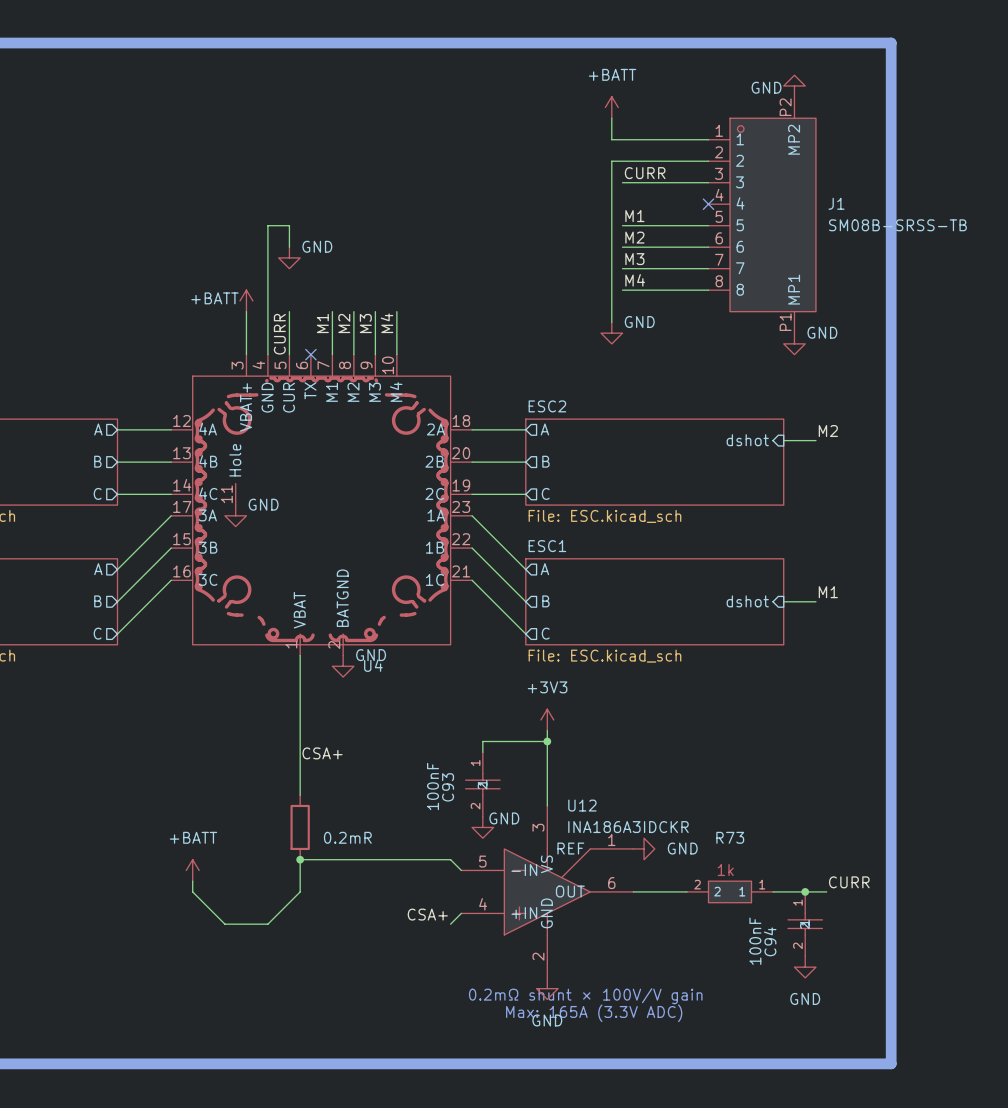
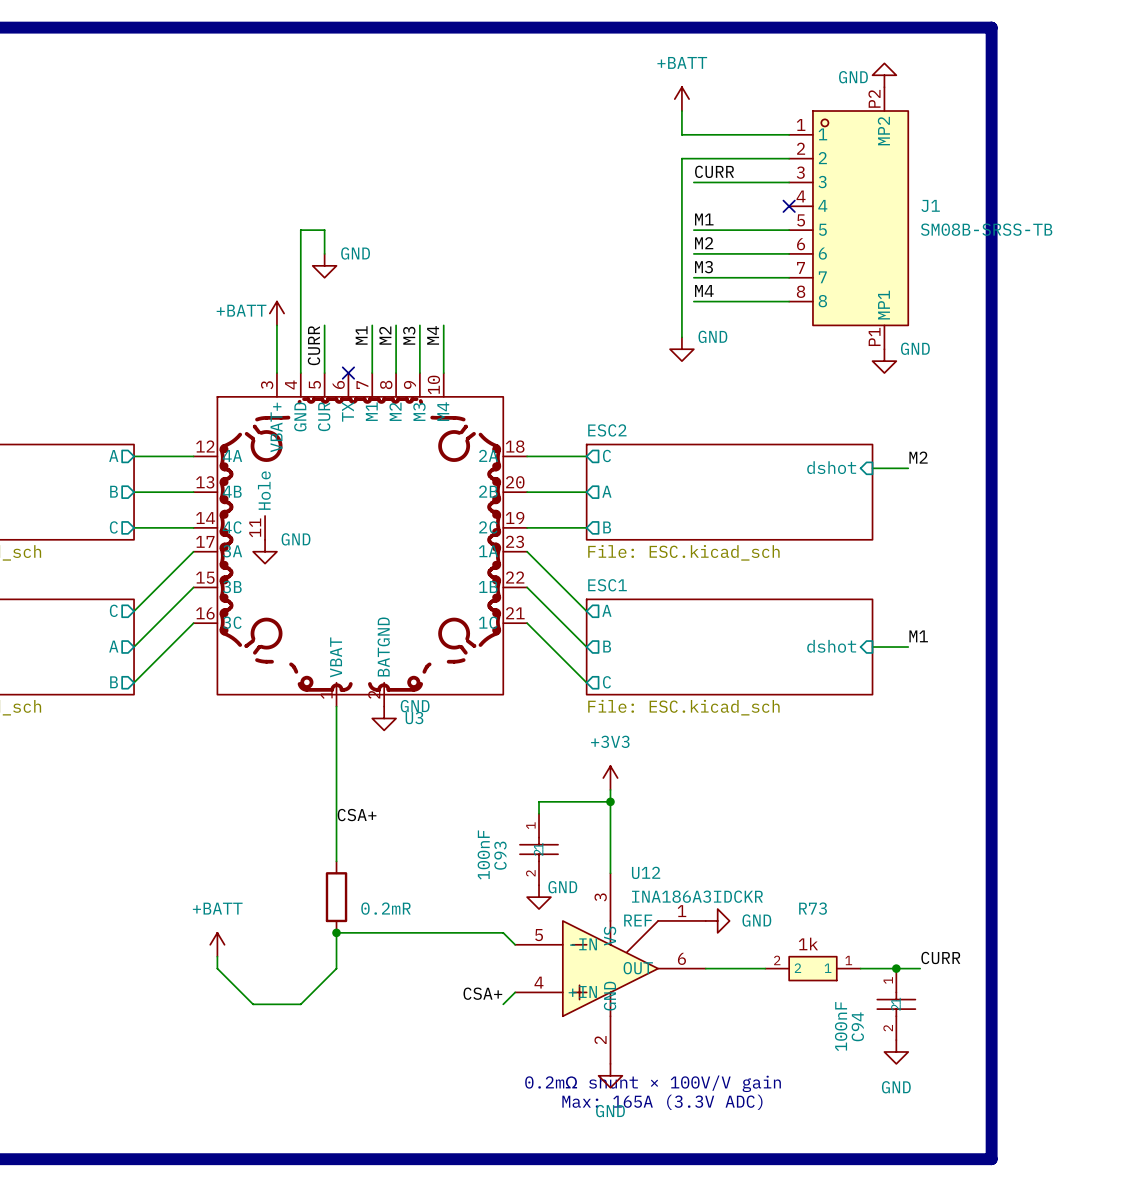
sheet pin: A (544, 429) -> C (606, 455)
sheet pin: B (545, 461) -> A (606, 491)
sheet pin: C (545, 493) -> B (607, 527)
sheet pin: A (98, 569) -> C (113, 610)
sheet pin: B (97, 601) -> A (113, 646)
sheet pin: C (97, 633) -> B (114, 682)
U4 name: U4 (373, 665) -> U3 (414, 718)

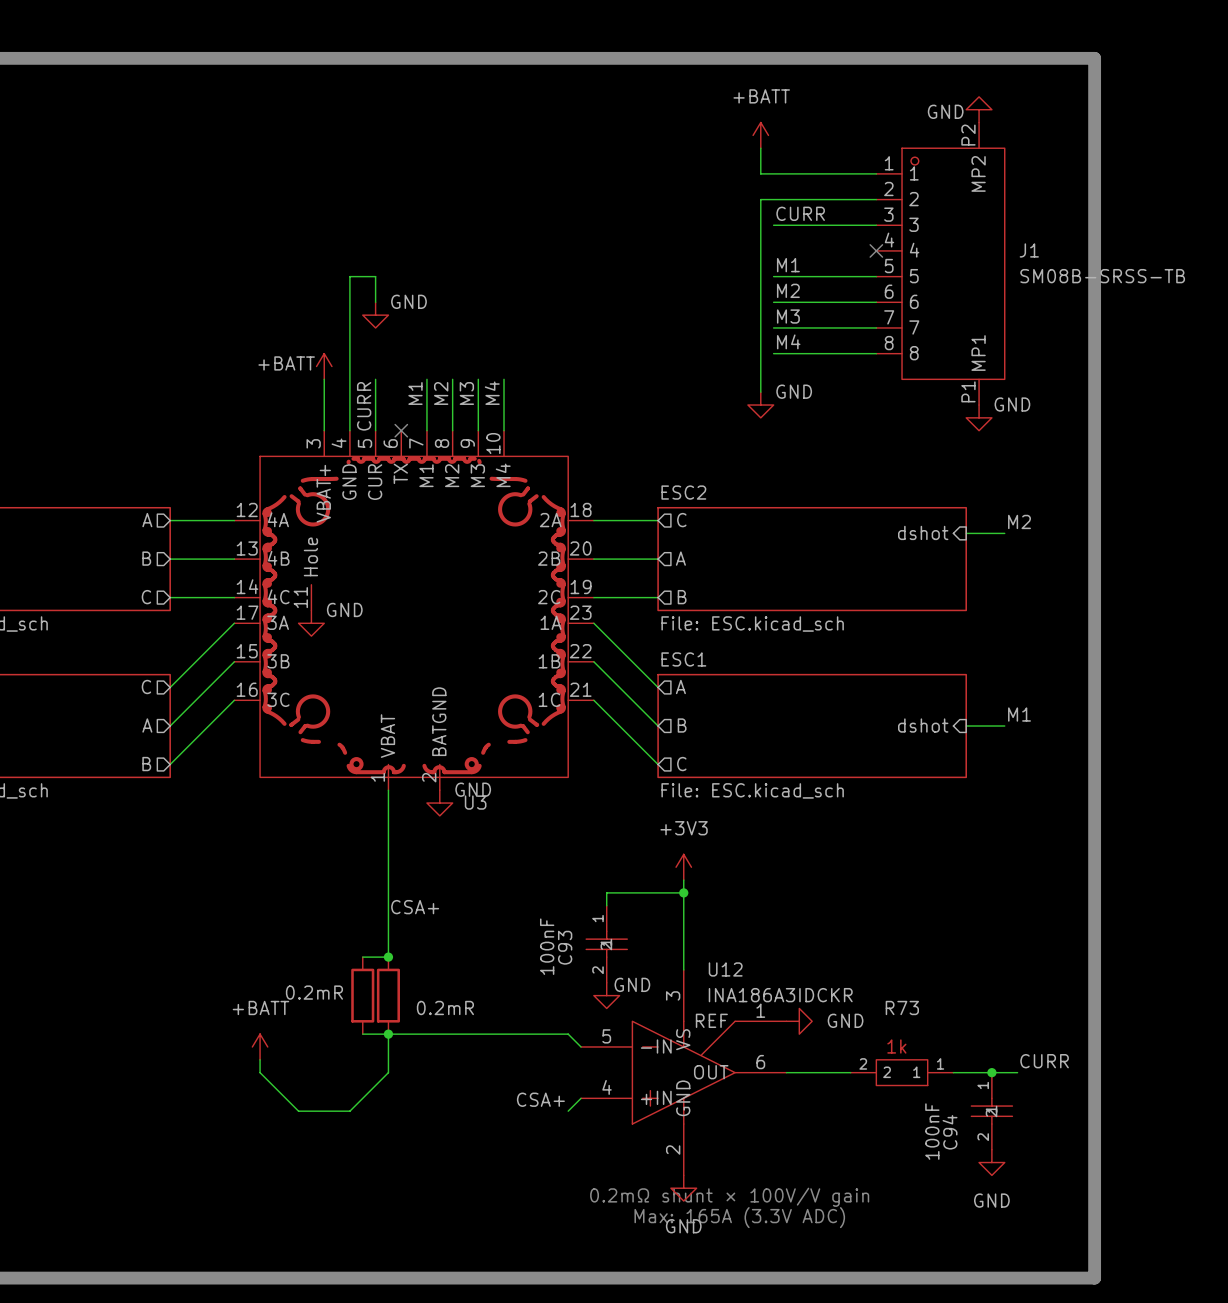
wire: none -> (362, 957) (388, 957)
junction: none -> (388, 957)
part: none -> 0.2mR (362, 995)
wire: none -> (362, 1034) (388, 1034)

